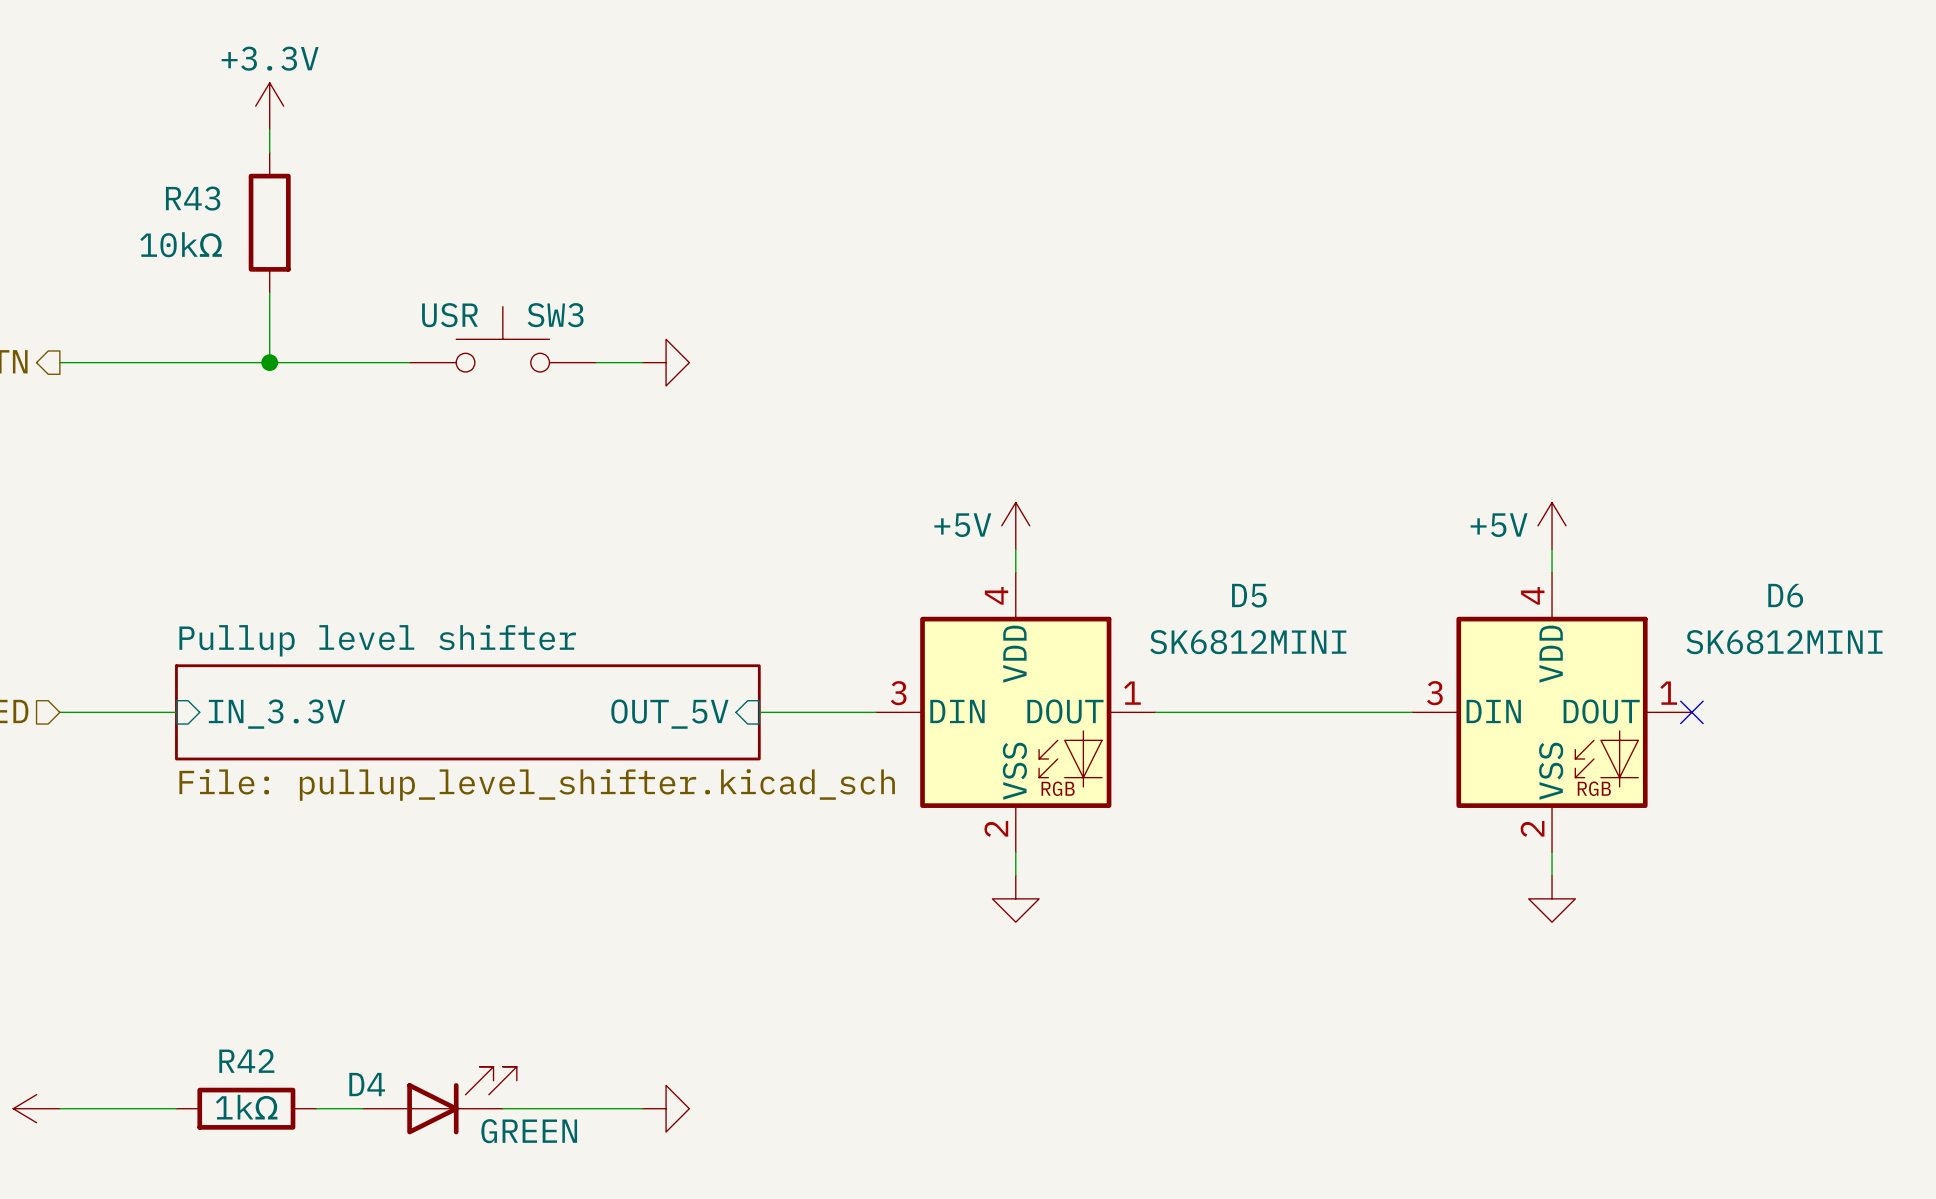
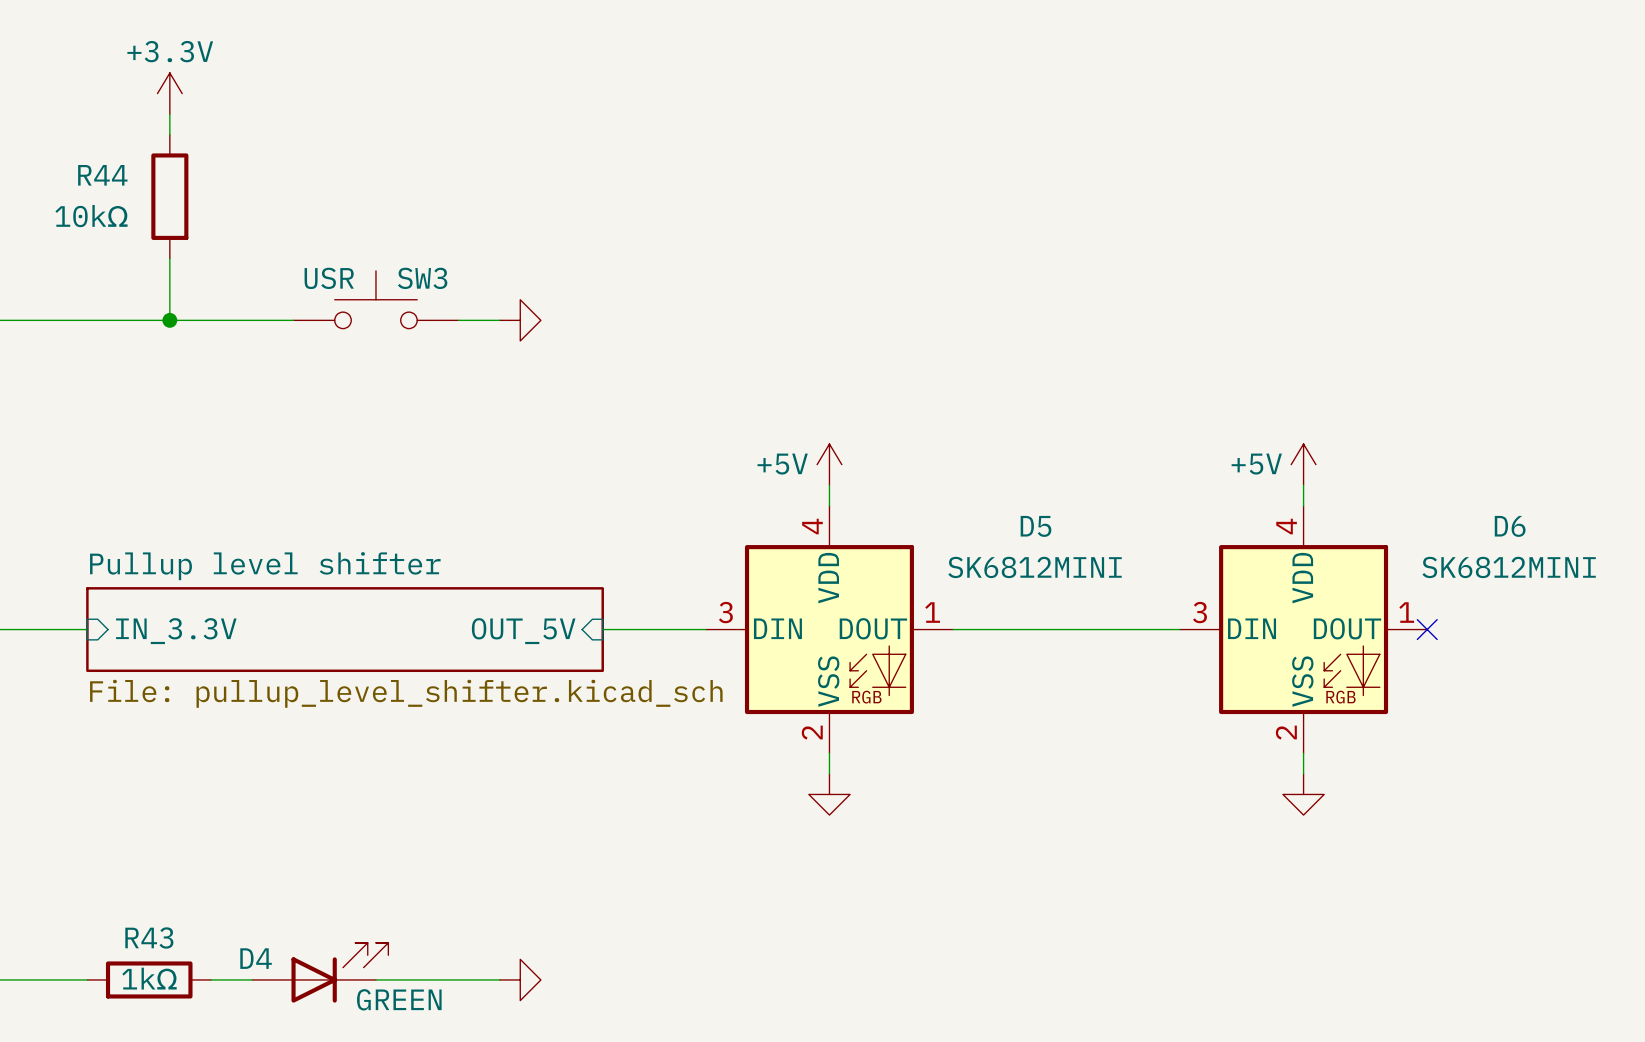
R43 name: R43 (193, 198) -> R44 (102, 175)
R42 name: R42 (246, 1061) -> R43 (149, 937)

